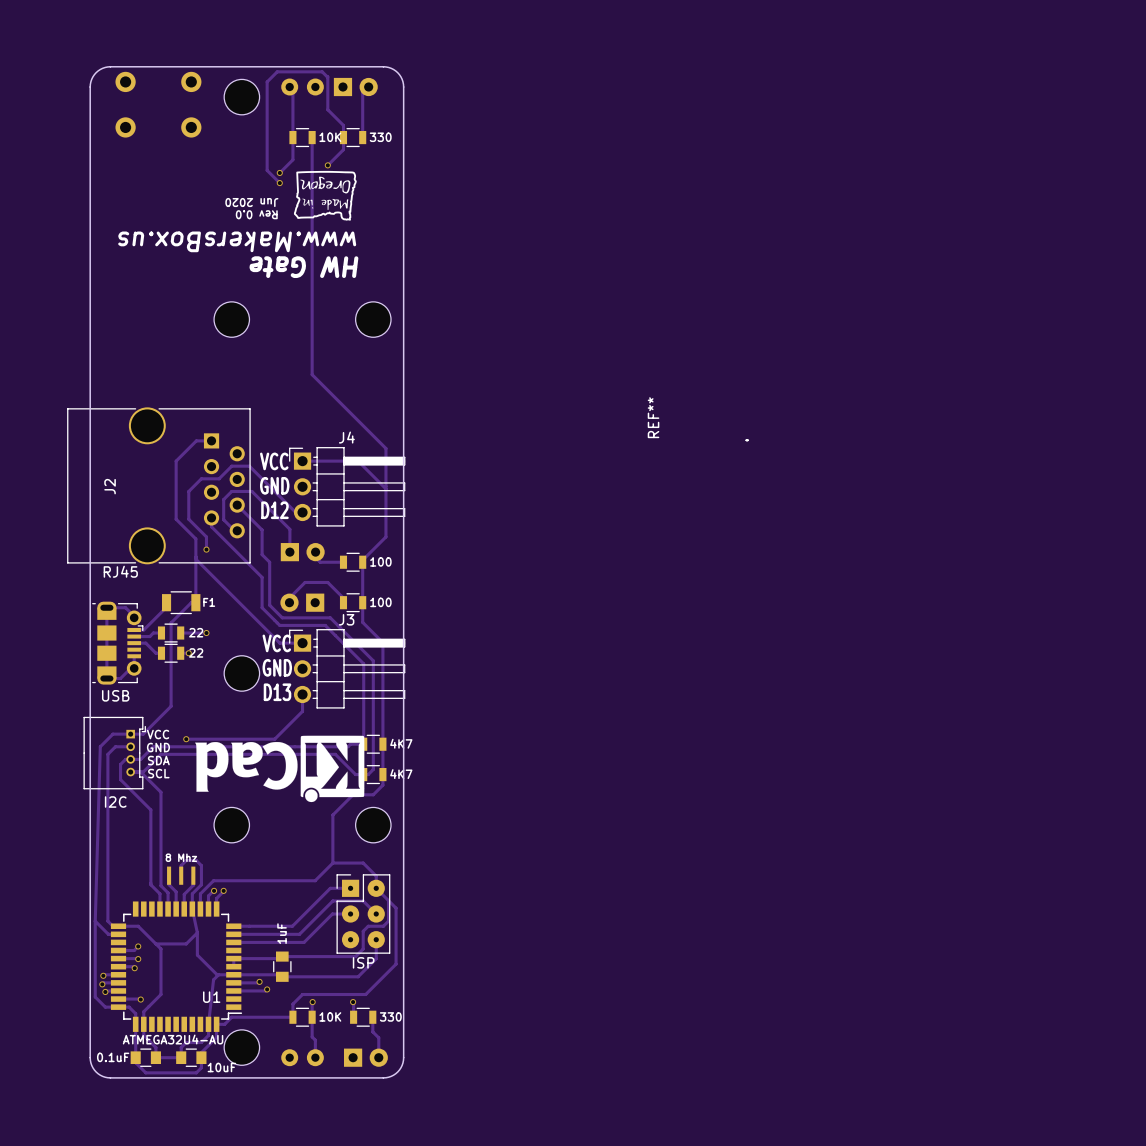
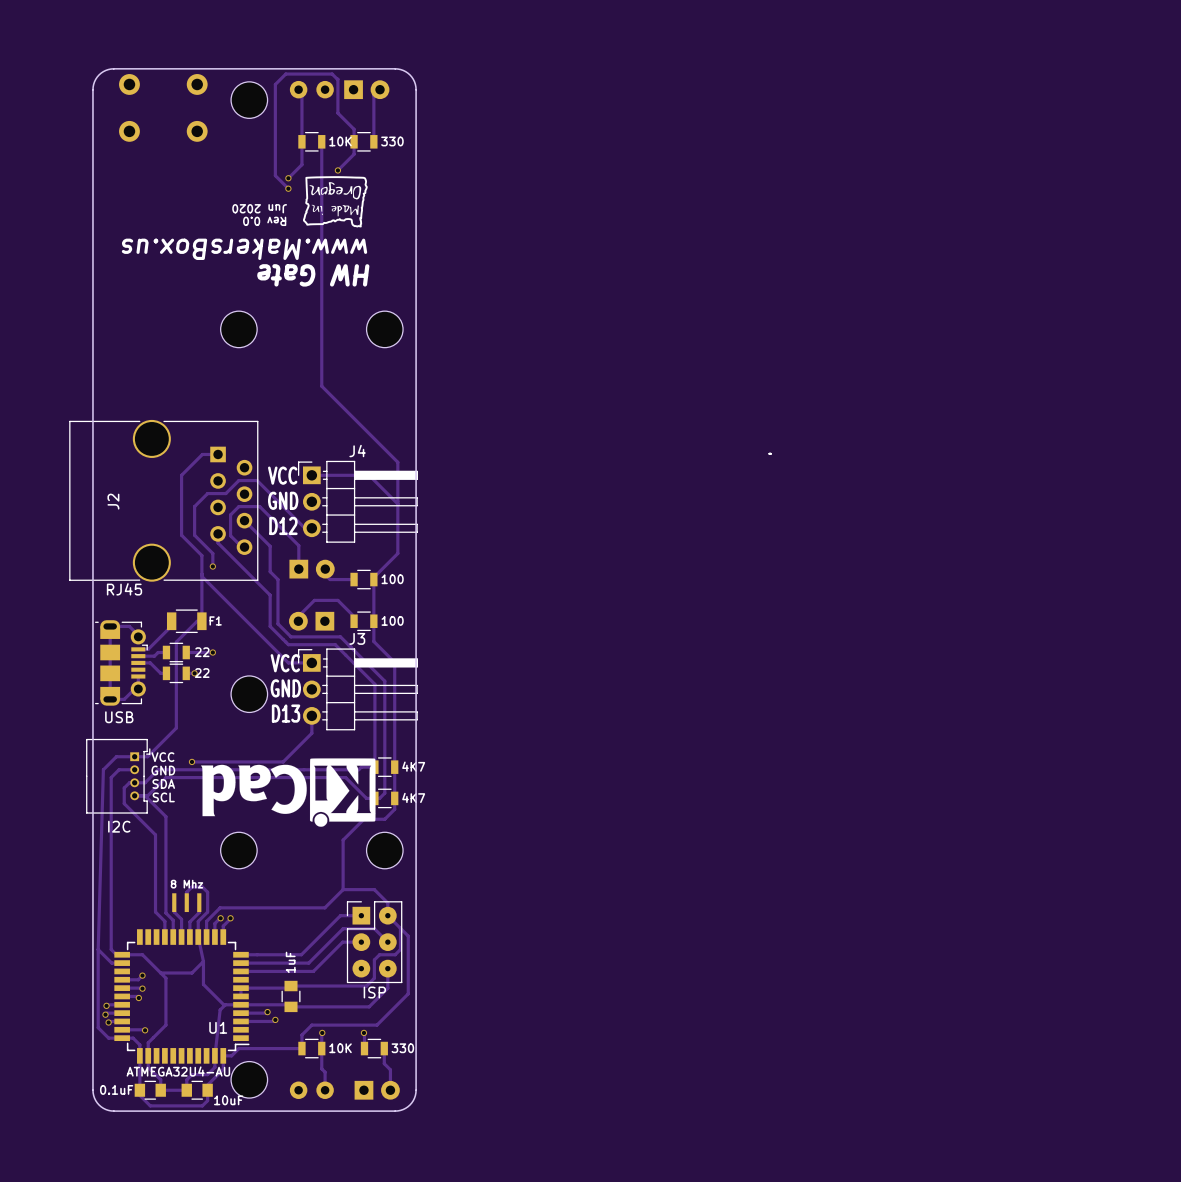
REF**: (653, 417) -> none

